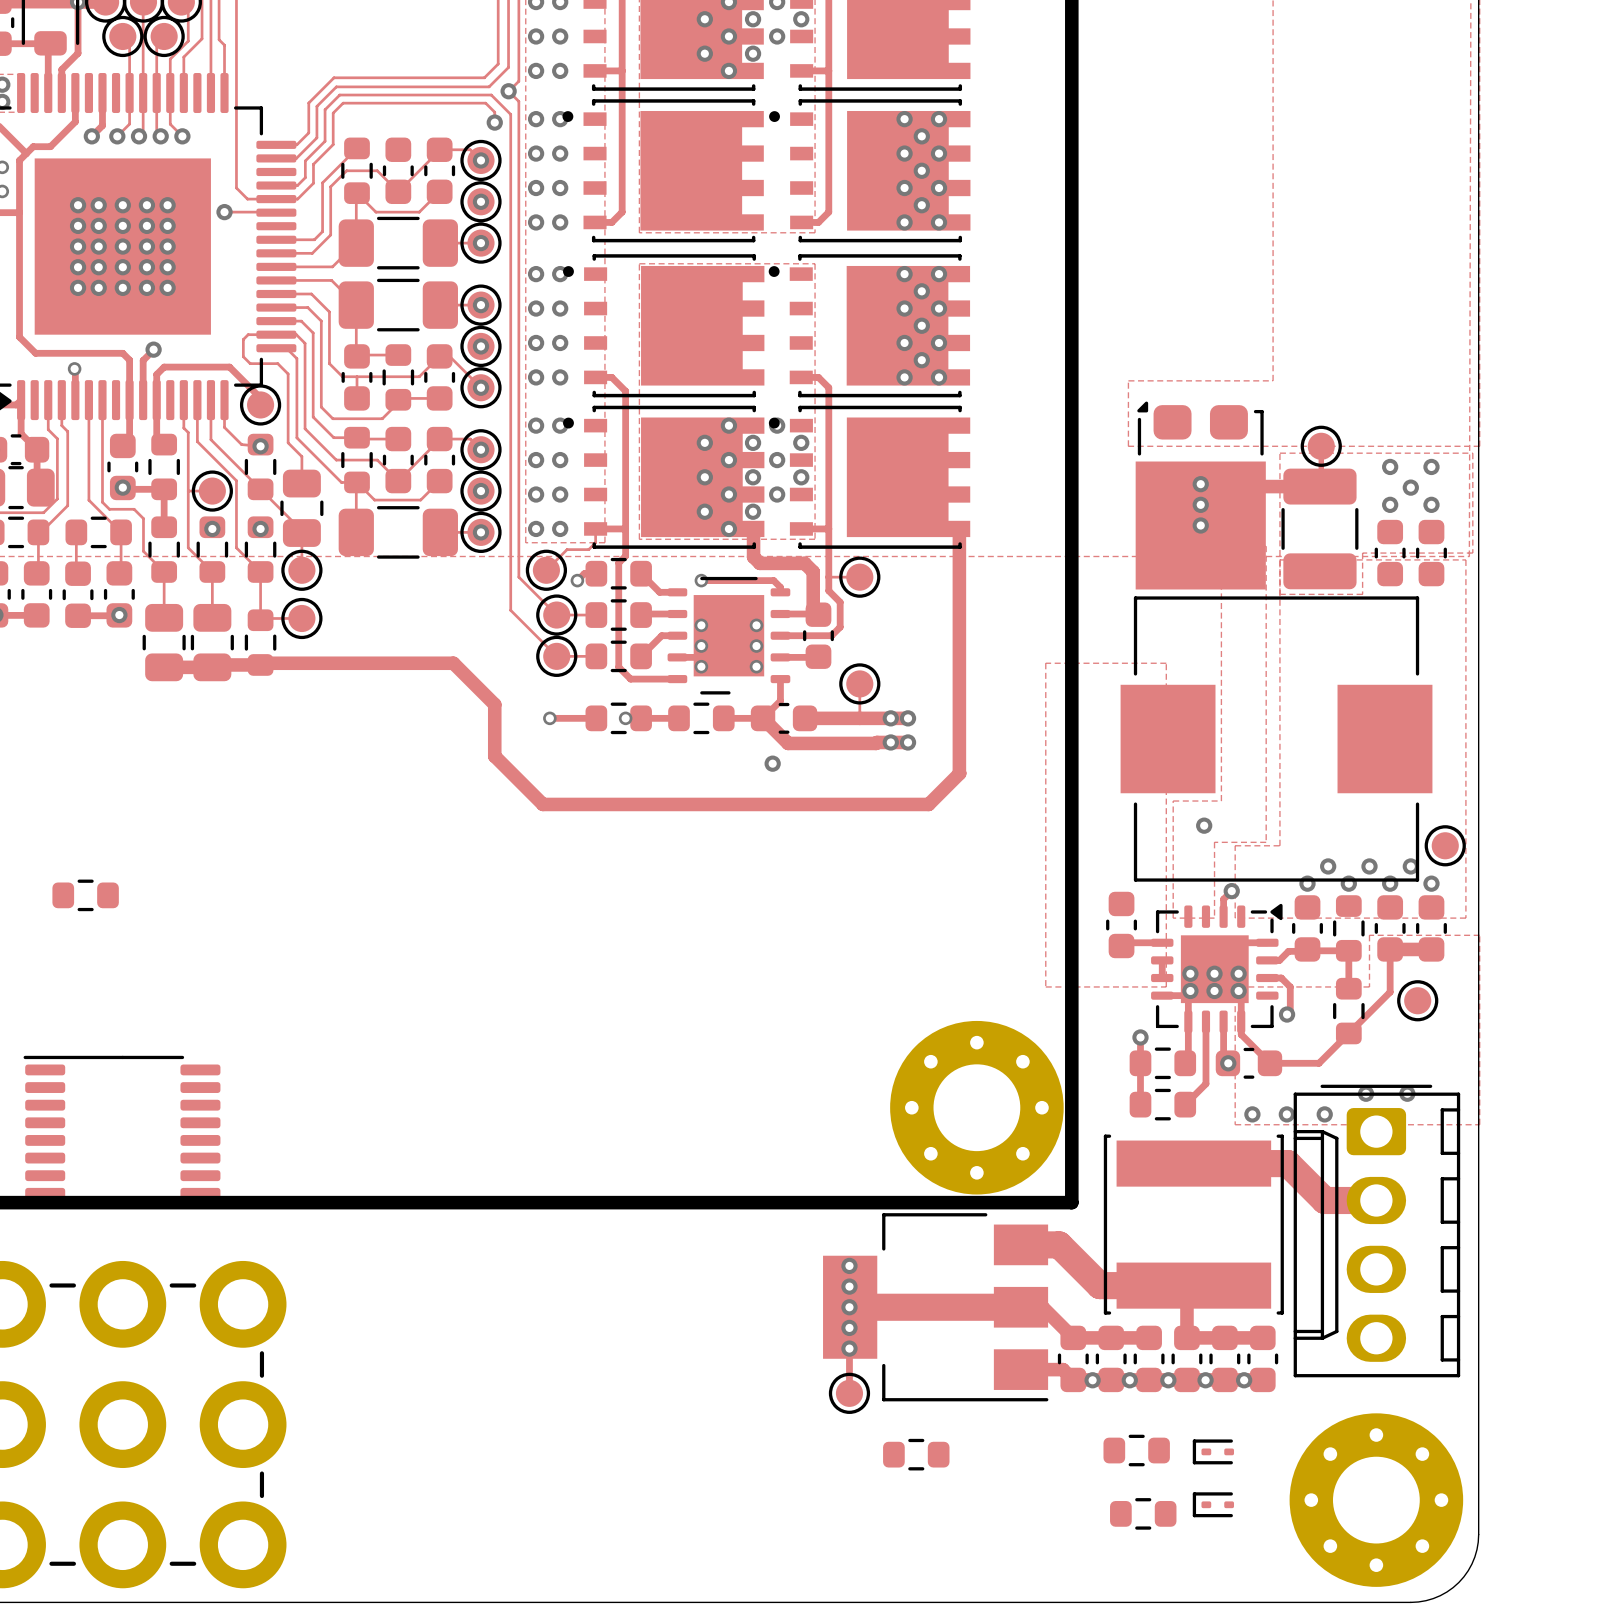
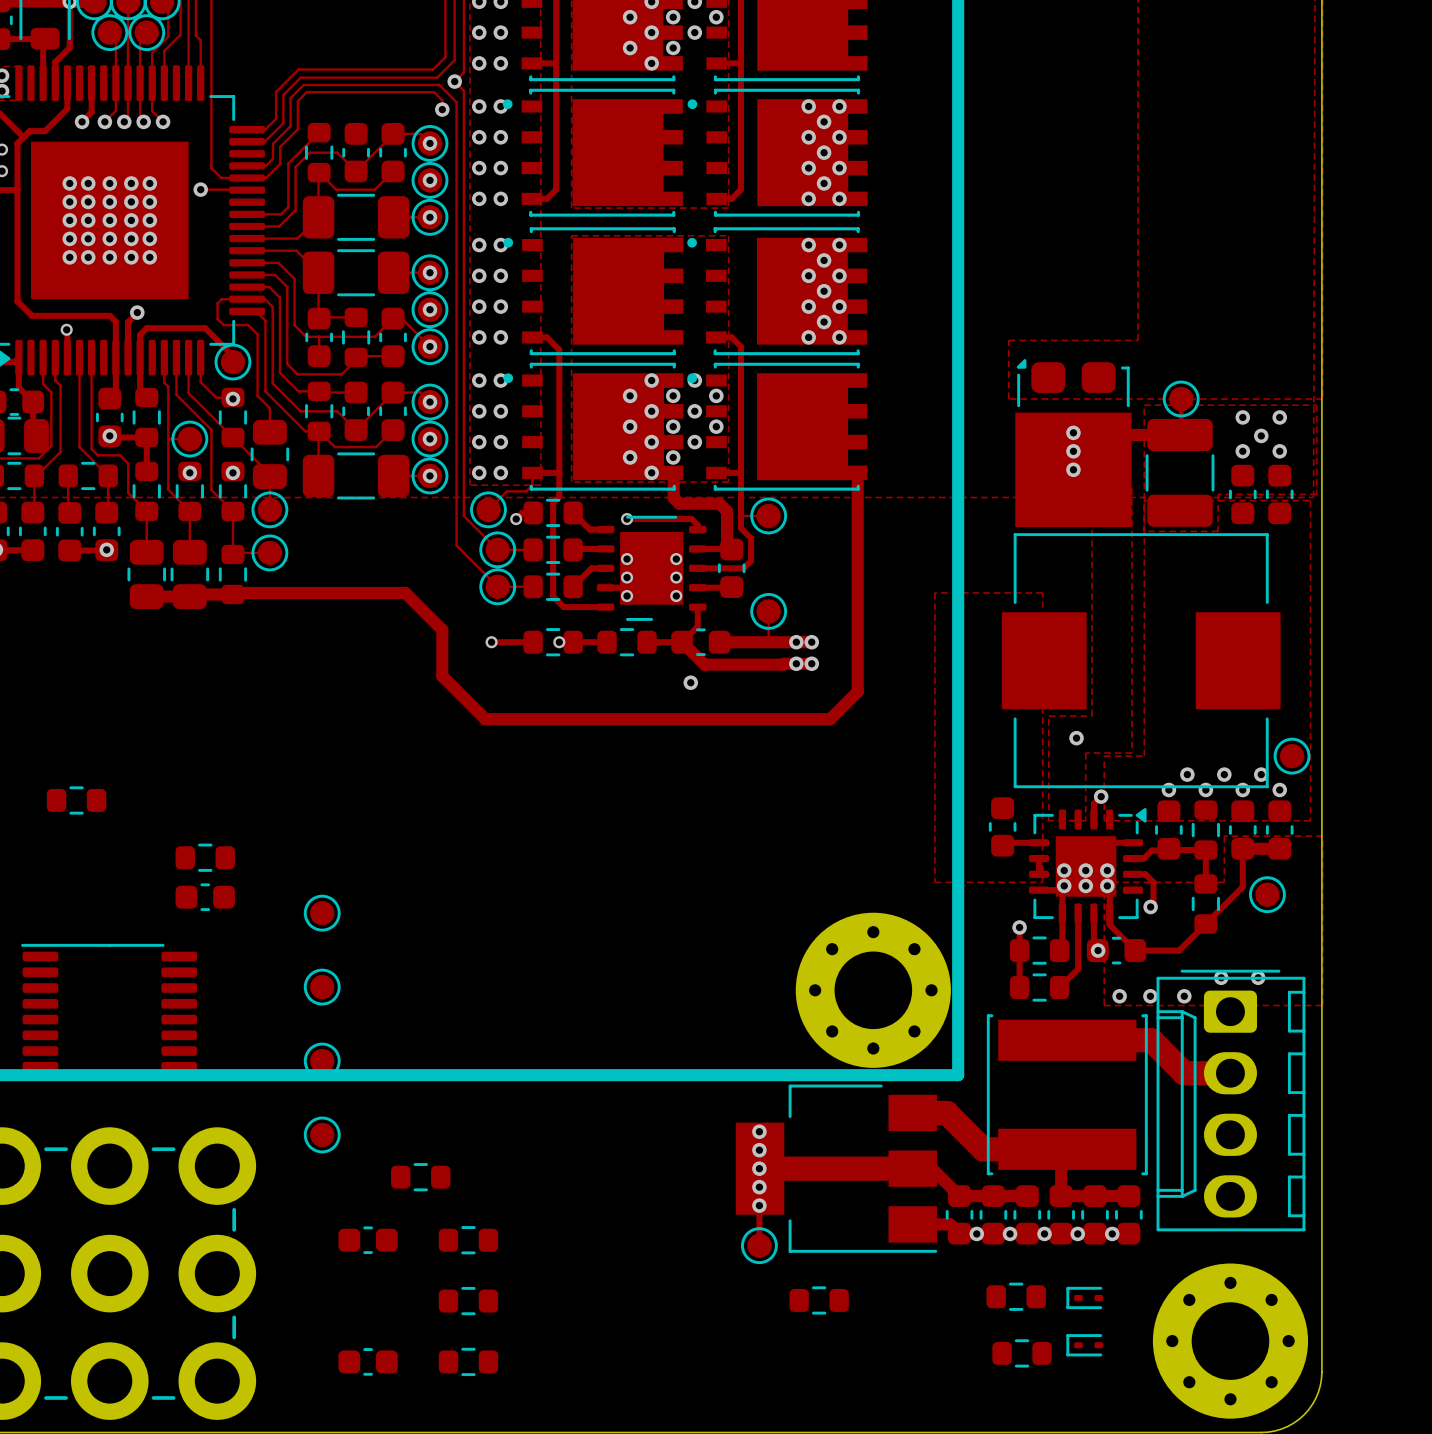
part: none -> (205, 857)
part: none -> (205, 897)
part: none -> (322, 913)
part: none -> (322, 987)
part: none -> (322, 1061)
part: none -> (322, 1134)
part: none -> (420, 1177)
part: none -> (368, 1240)
part: none -> (468, 1240)
part: none -> (468, 1301)
part: none -> (368, 1361)
part: none -> (468, 1361)

